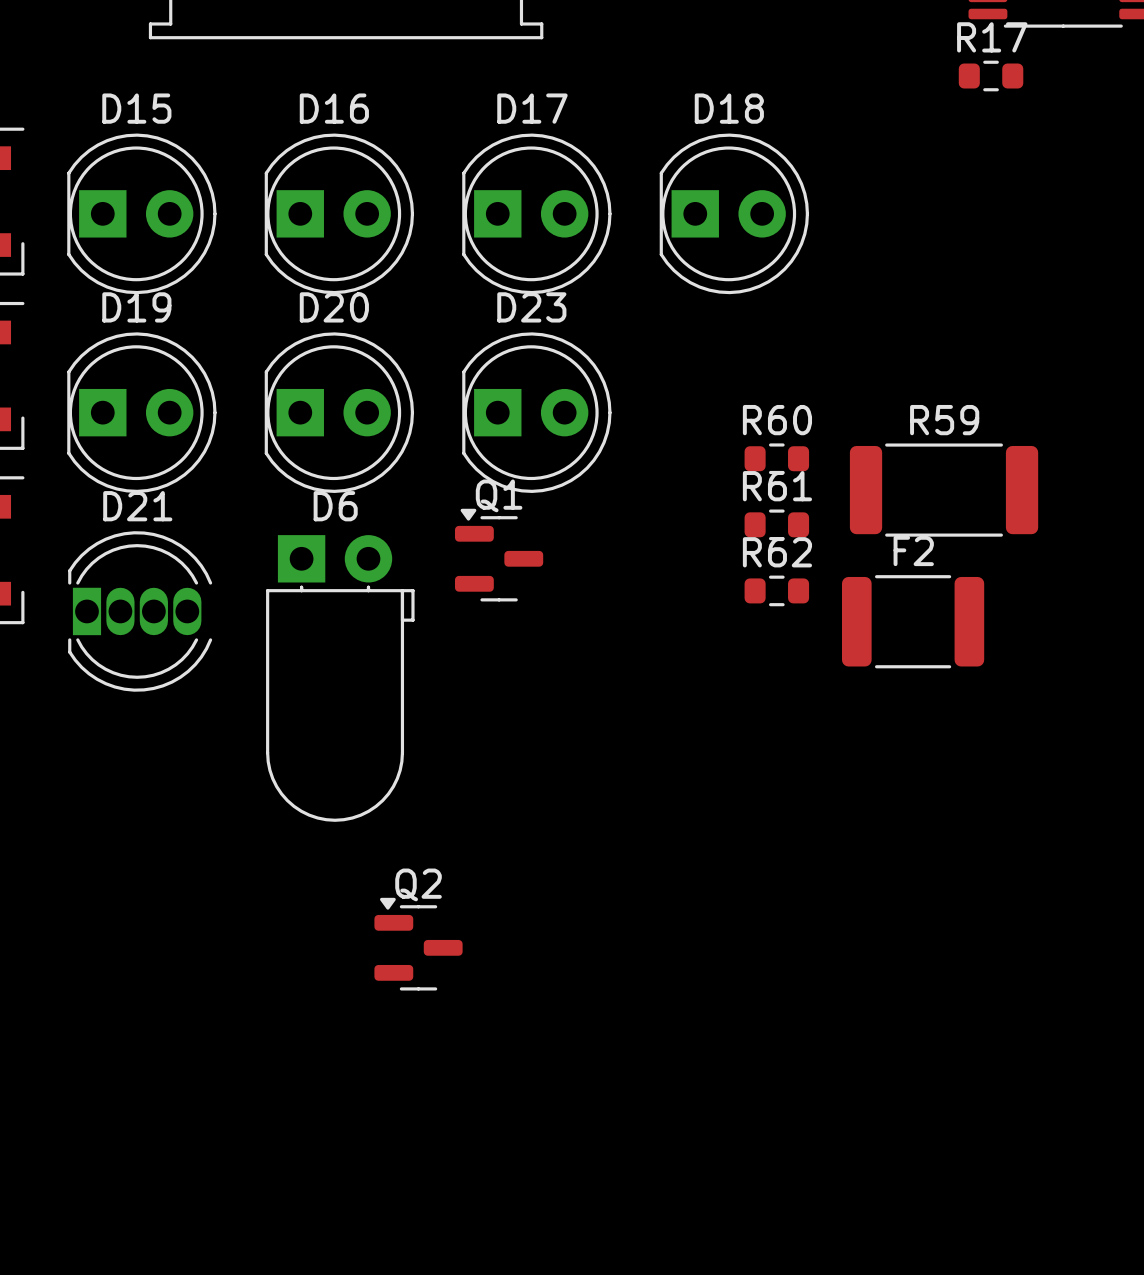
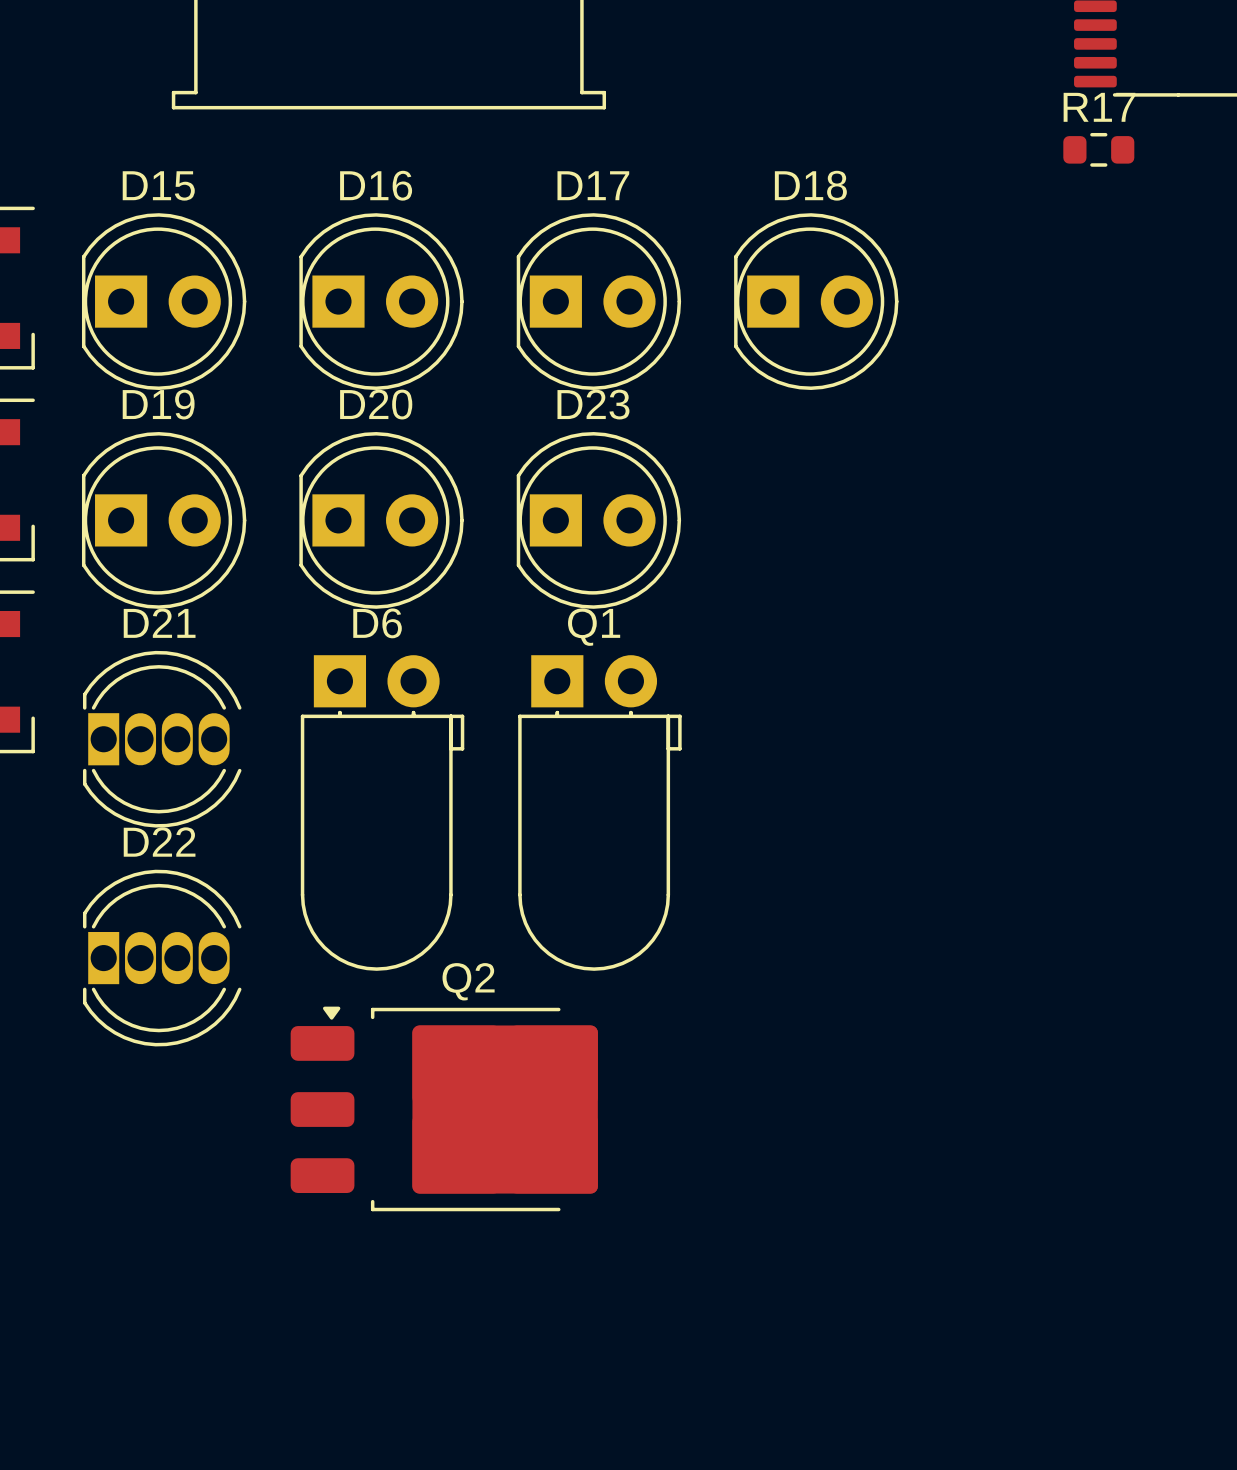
R60: (776, 458) -> none
R59: (944, 490) -> none
Q1 name position: Q1 (499, 495) -> Q1 (594, 627)
Q1 footprint: [454, 508, 544, 602] -> [518, 655, 682, 971]
R61: (776, 524) -> none
R62: (776, 590) -> none
F2: (913, 621) -> none
D22: none -> (162, 958)
Q2 name position: Q2 (418, 884) -> Q2 (468, 981)
Q2 footprint: [374, 897, 463, 991] -> [290, 1006, 598, 1212]

